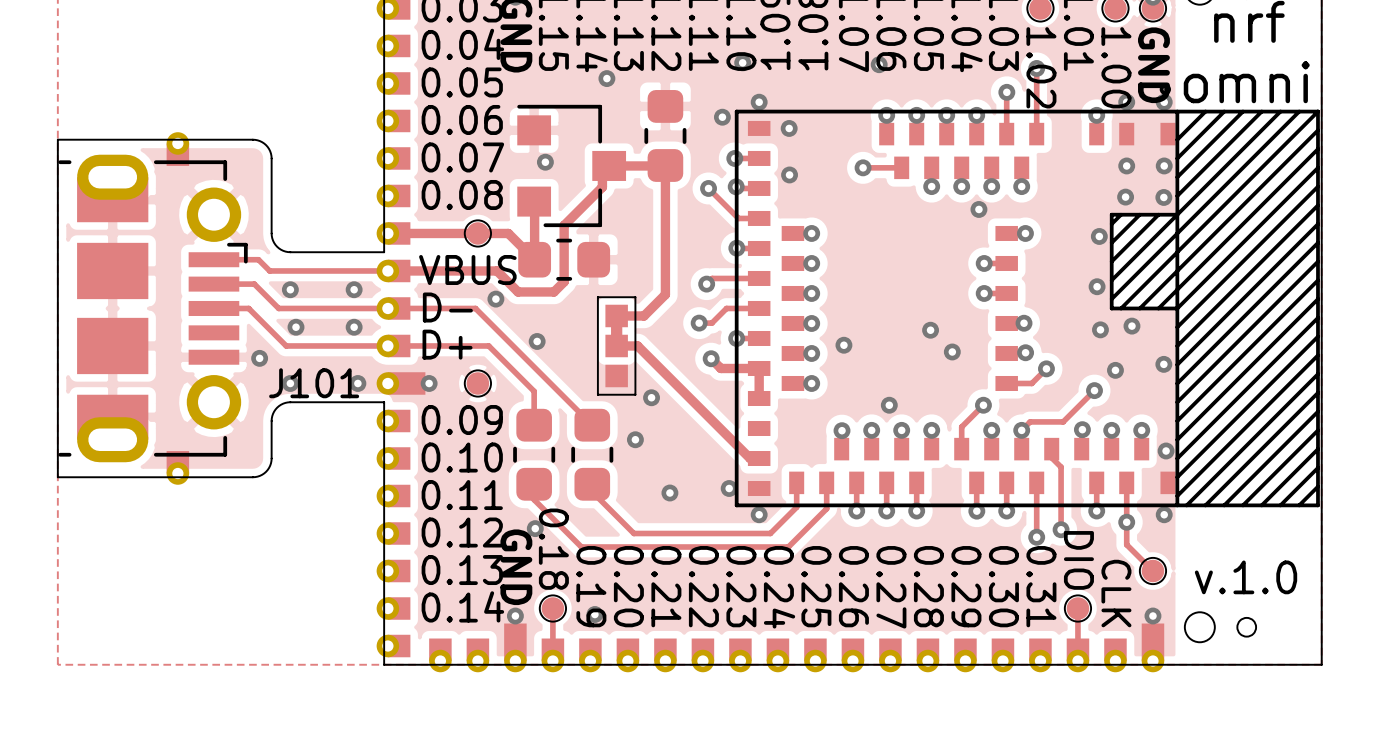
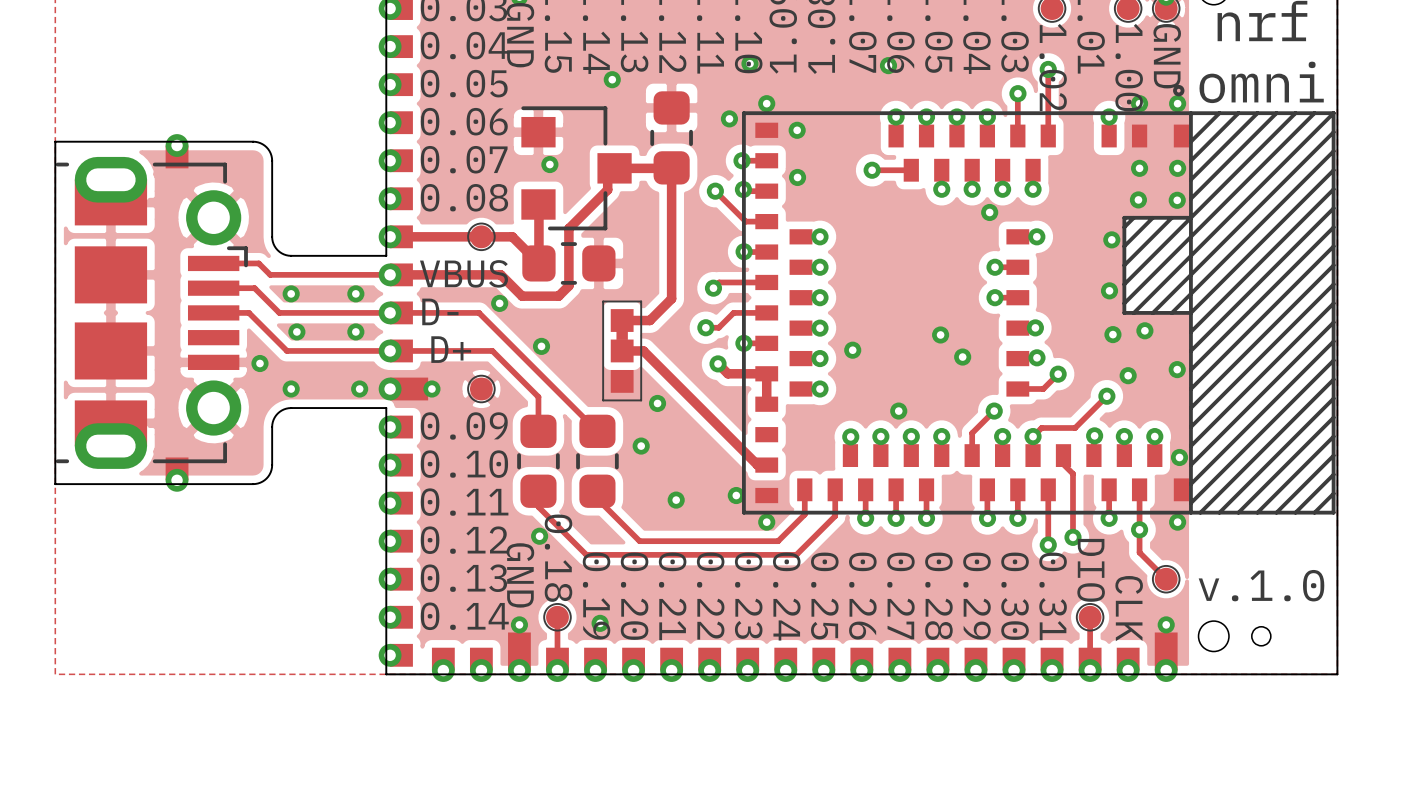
J101 name: J101 (314, 383) -> none

